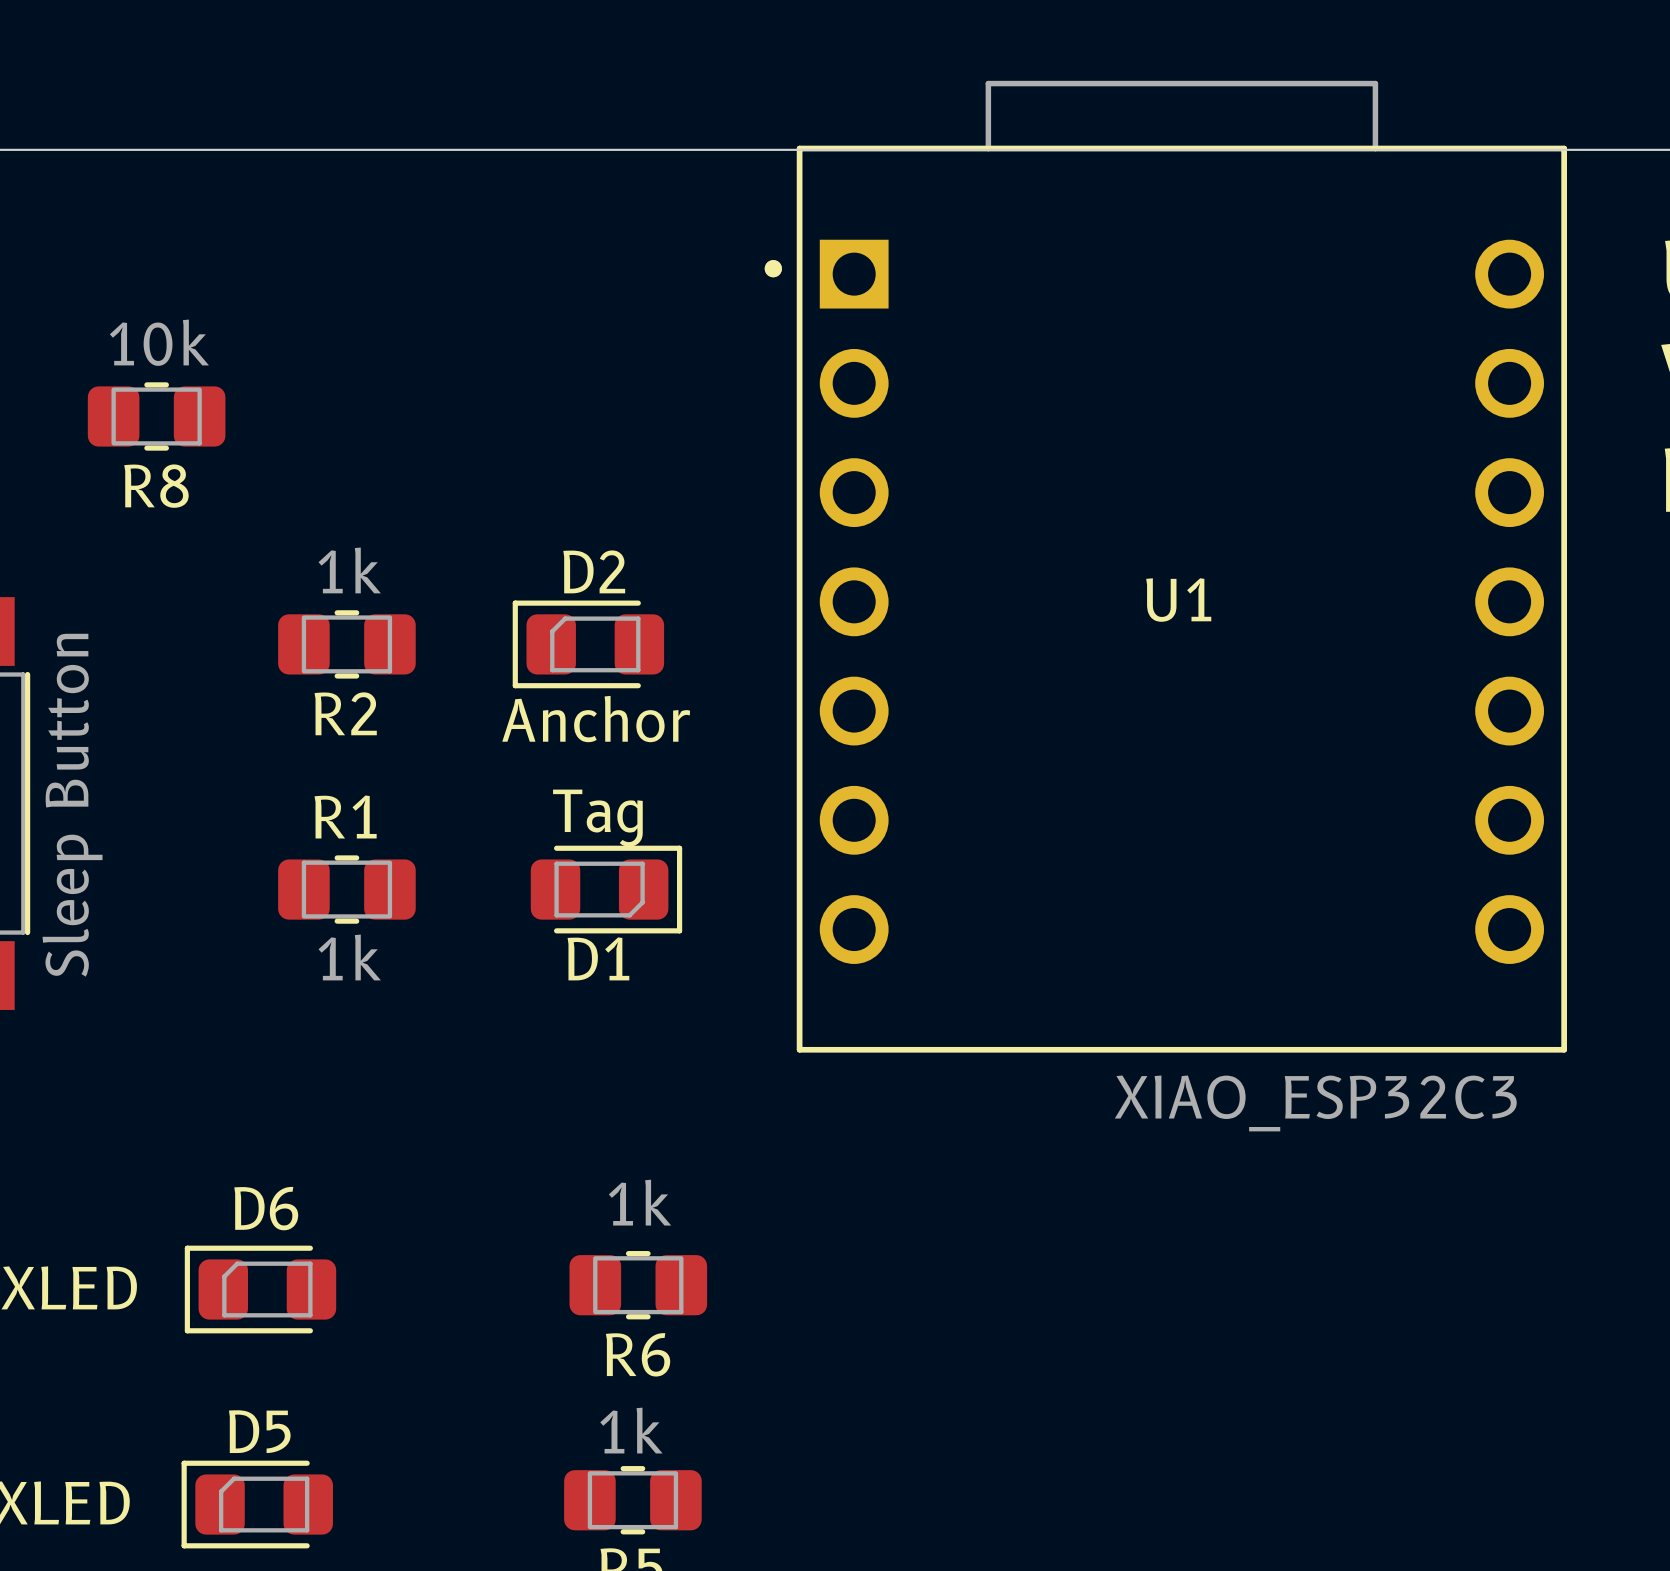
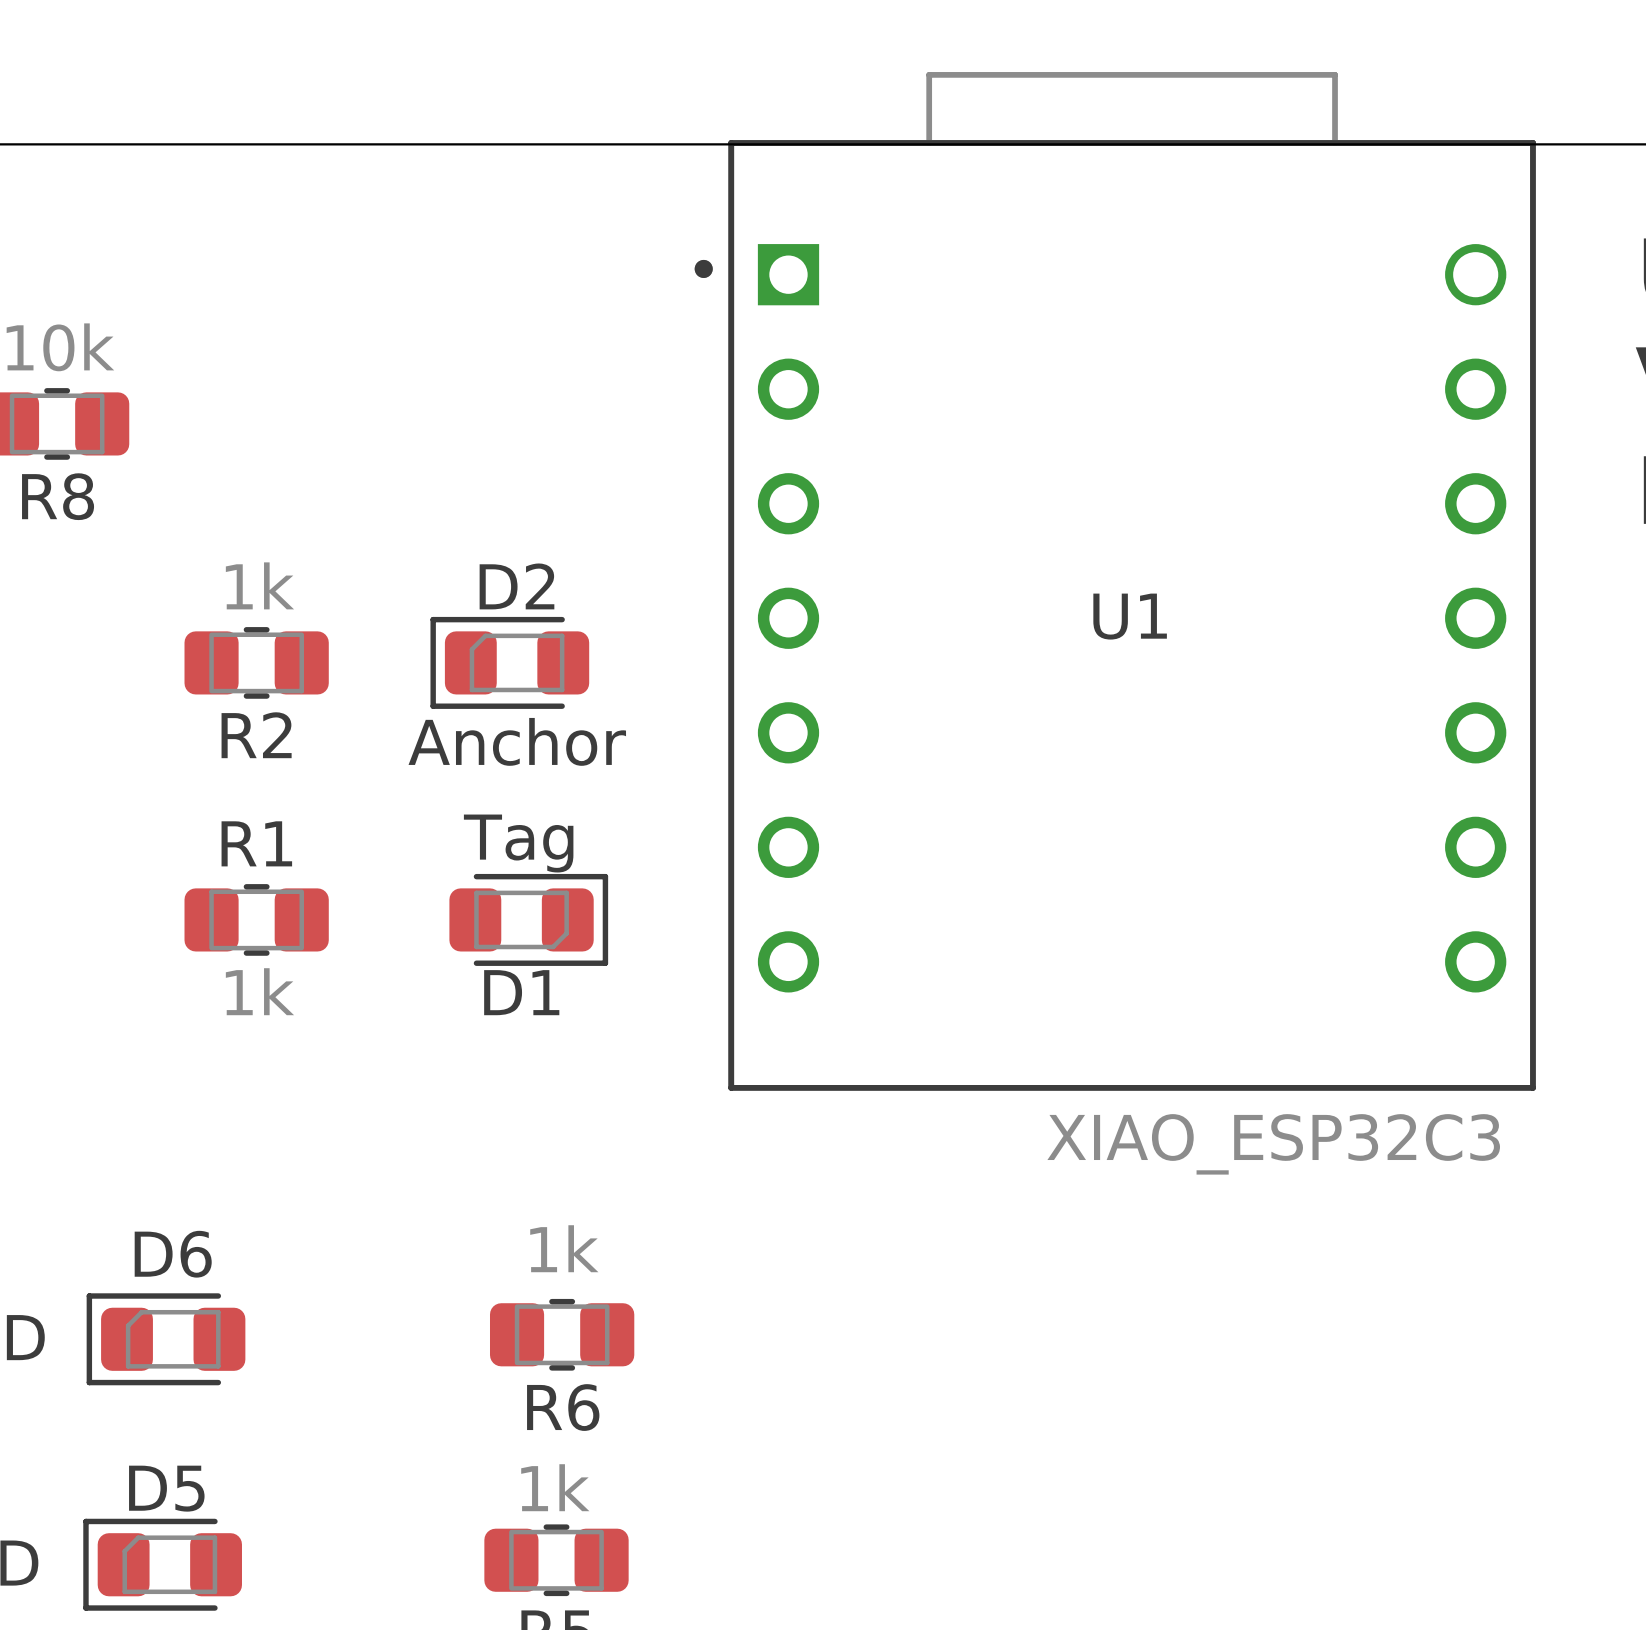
U1 footprint: [764, 80, 1567, 1053] -> [694, 72, 1536, 1091]

